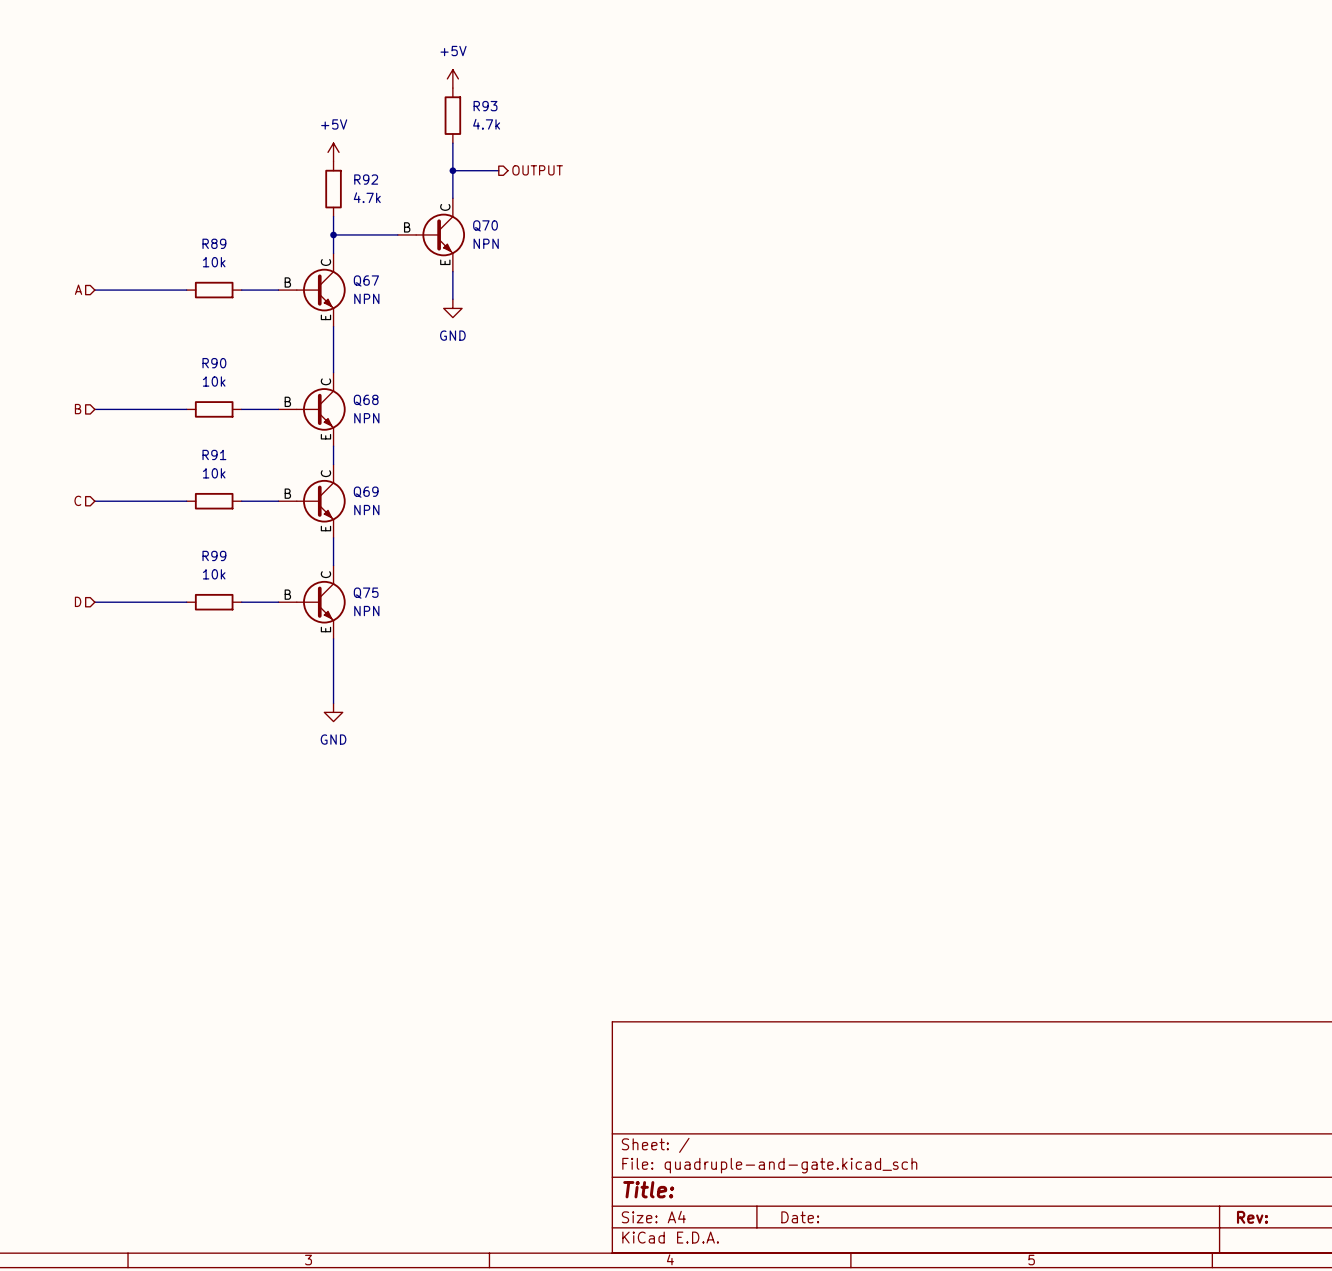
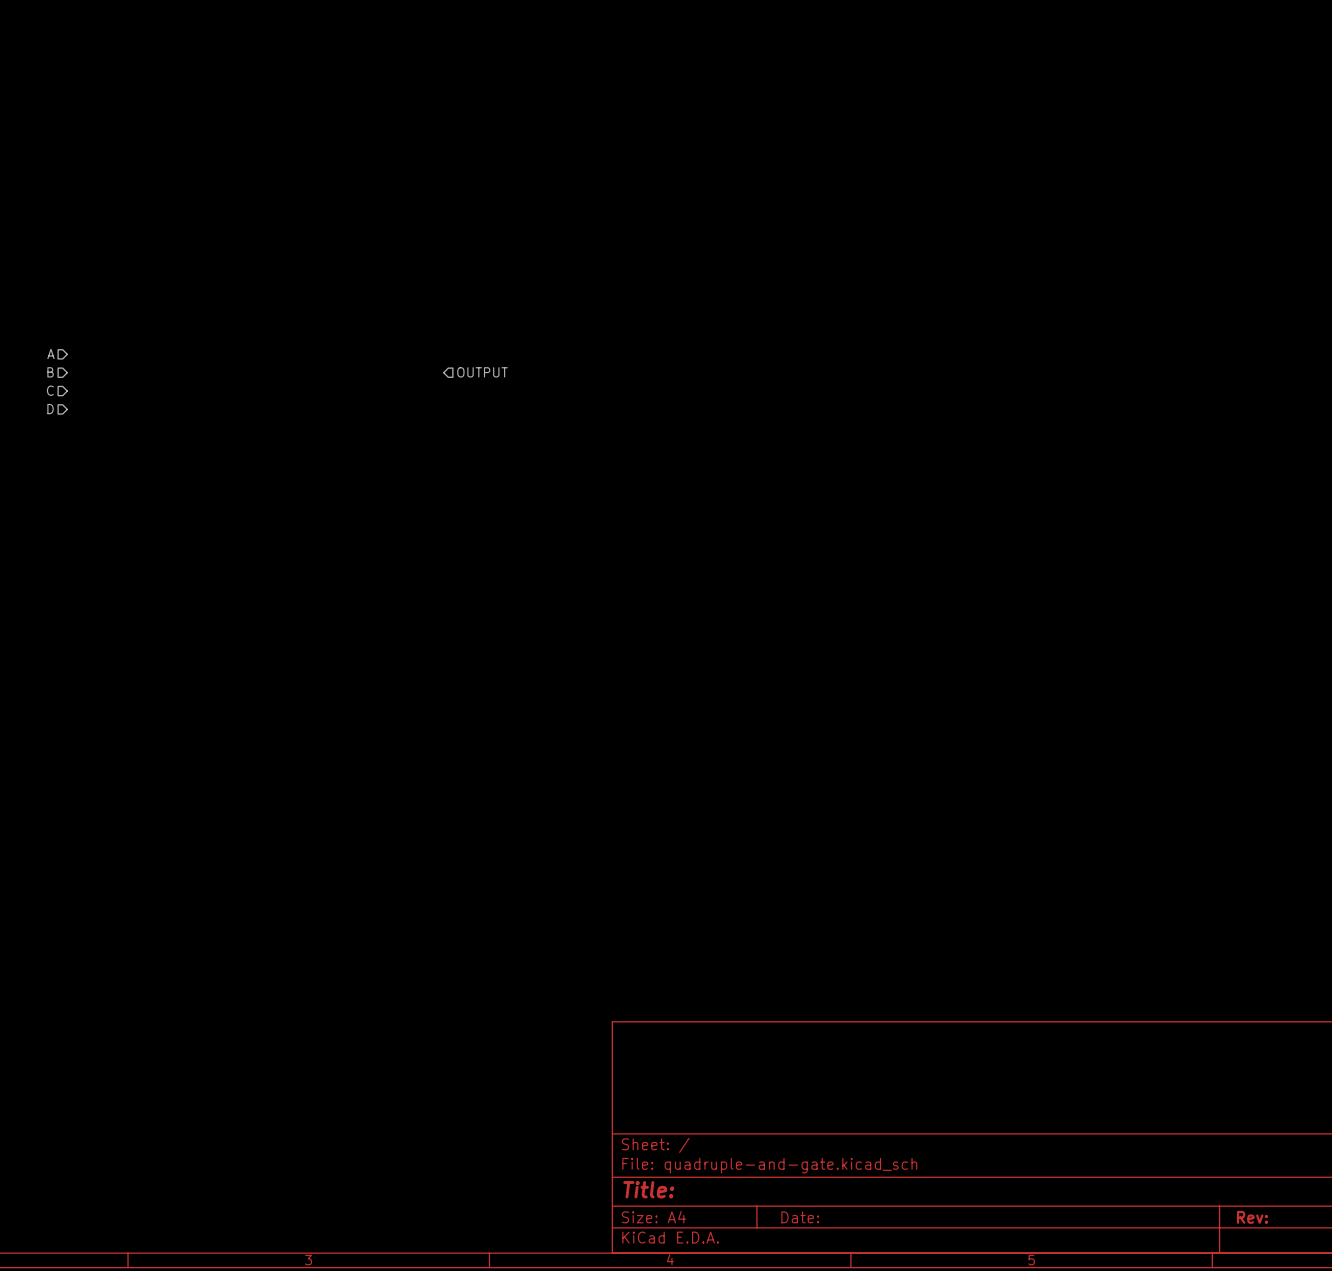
power symbol: +5V (452, 78) -> none
R93: 4.7k (452, 115) -> none
wire: (452, 143) (452, 198) -> none
power symbol: +5V (333, 152) -> none
wire: (452, 170) (498, 170) -> none
junction: (452, 170) -> none
hierarchical label: OUTPUT (537, 170) -> none
R92: 4.7k (333, 189) -> none
wire: (333, 216) (333, 253) -> none
wire: (333, 234) (397, 234) -> none
junction: (333, 234) -> none
Q70: NPN (431, 234) -> none
wire: (452, 271) (452, 299) -> none
hierarchical label position: A (78, 289) -> A (50, 353)
wire: (94, 290) (186, 290) -> none
R89: 10k (214, 290) -> none
wire: (241, 290) (278, 290) -> none
Q67: NPN (312, 290) -> none
power symbol: GND (452, 308) -> none
wire: (333, 326) (333, 372) -> none
hierarchical label: none -> OUTPUT (482, 372)
hierarchical label: none -> D (50, 409)
hierarchical label position: B (78, 409) -> B (50, 372)
wire: (94, 409) (186, 409) -> none
R90: 10k (214, 409) -> none
wire: (241, 409) (278, 409) -> none
Q68: NPN (312, 409) -> none
wire: (333, 446) (333, 464) -> none
hierarchical label position: C (77, 500) -> C (50, 390)
wire: (94, 501) (186, 501) -> none
R91: 10k (214, 501) -> none
wire: (241, 501) (278, 501) -> none
Q69: NPN (312, 501) -> none
wire: (333, 537) (333, 565) -> none
hierarchical label: D (78, 601) -> none
wire: (94, 602) (186, 602) -> none
R99: 10k (214, 602) -> none
wire: (241, 602) (278, 602) -> none
Q75: NPN (312, 602) -> none
wire: (333, 638) (333, 703) -> none
power symbol: GND (333, 712) -> none

